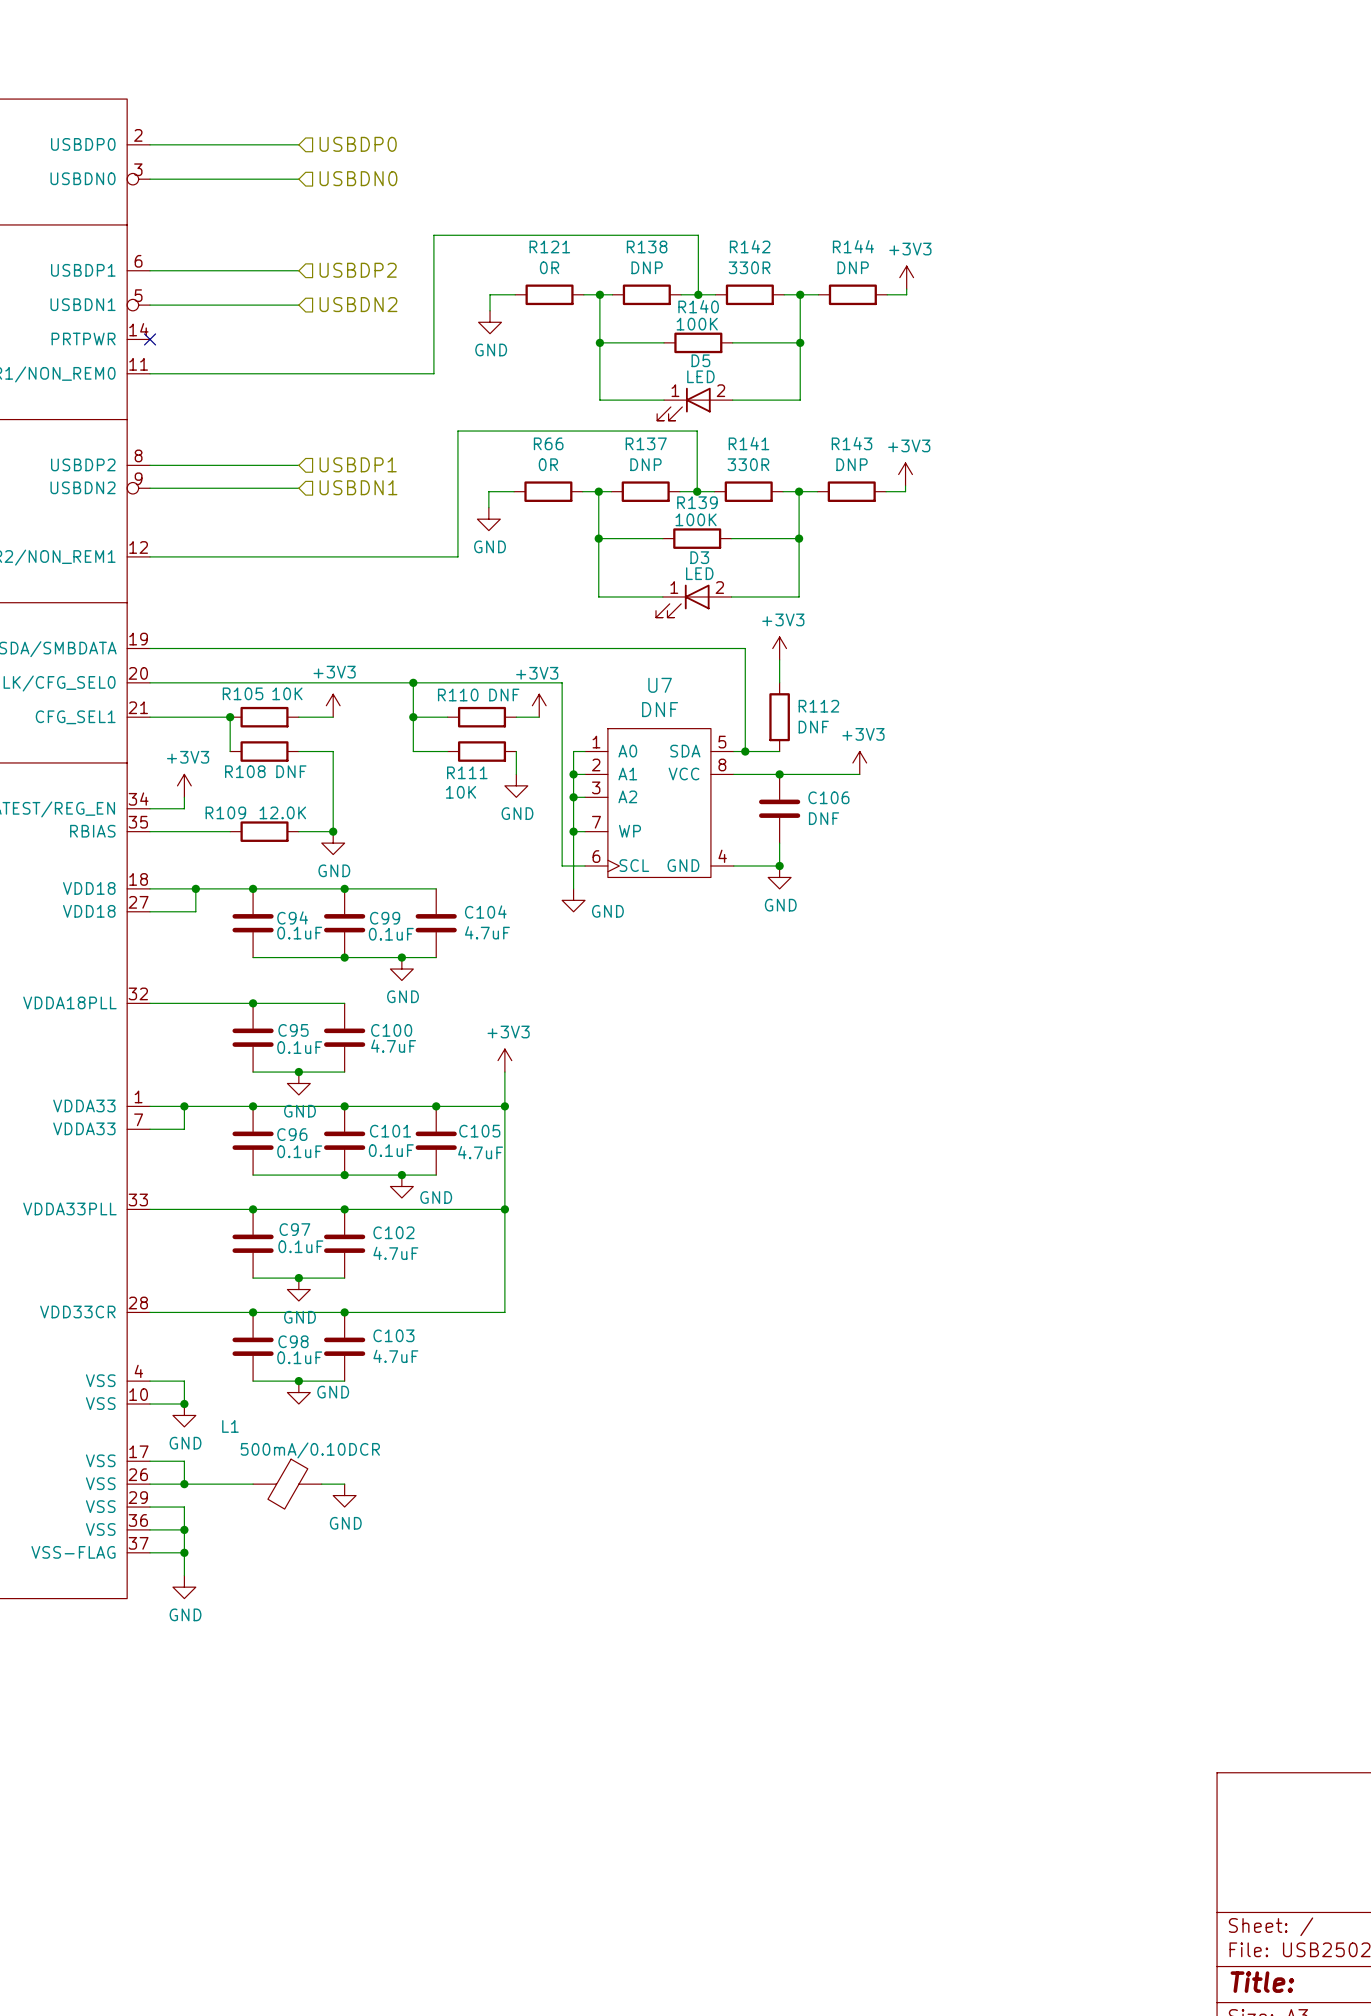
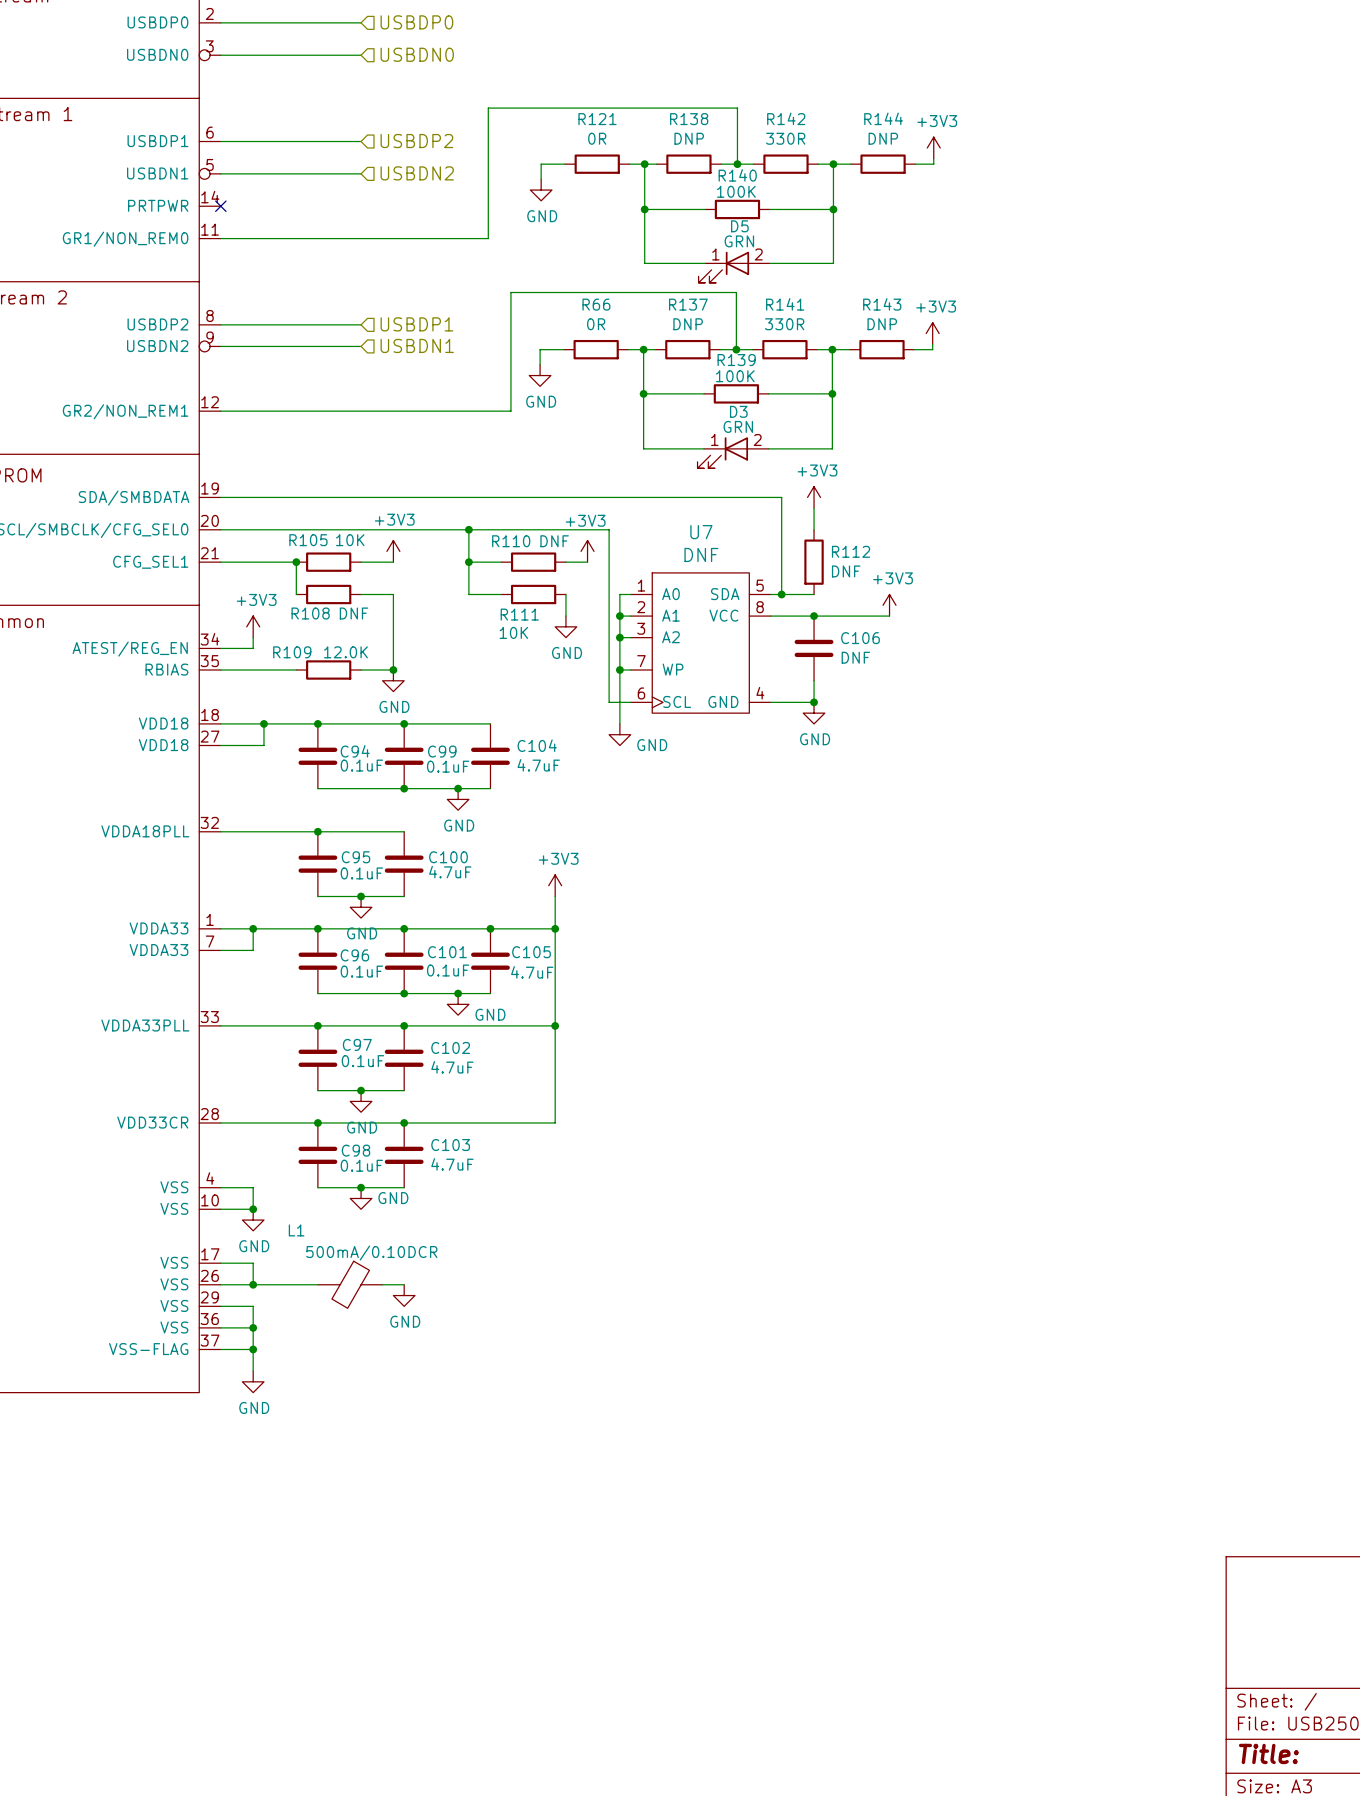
D5 value: LED (700, 376) -> GRN (739, 241)
D3 value: LED (699, 573) -> GRN (738, 426)

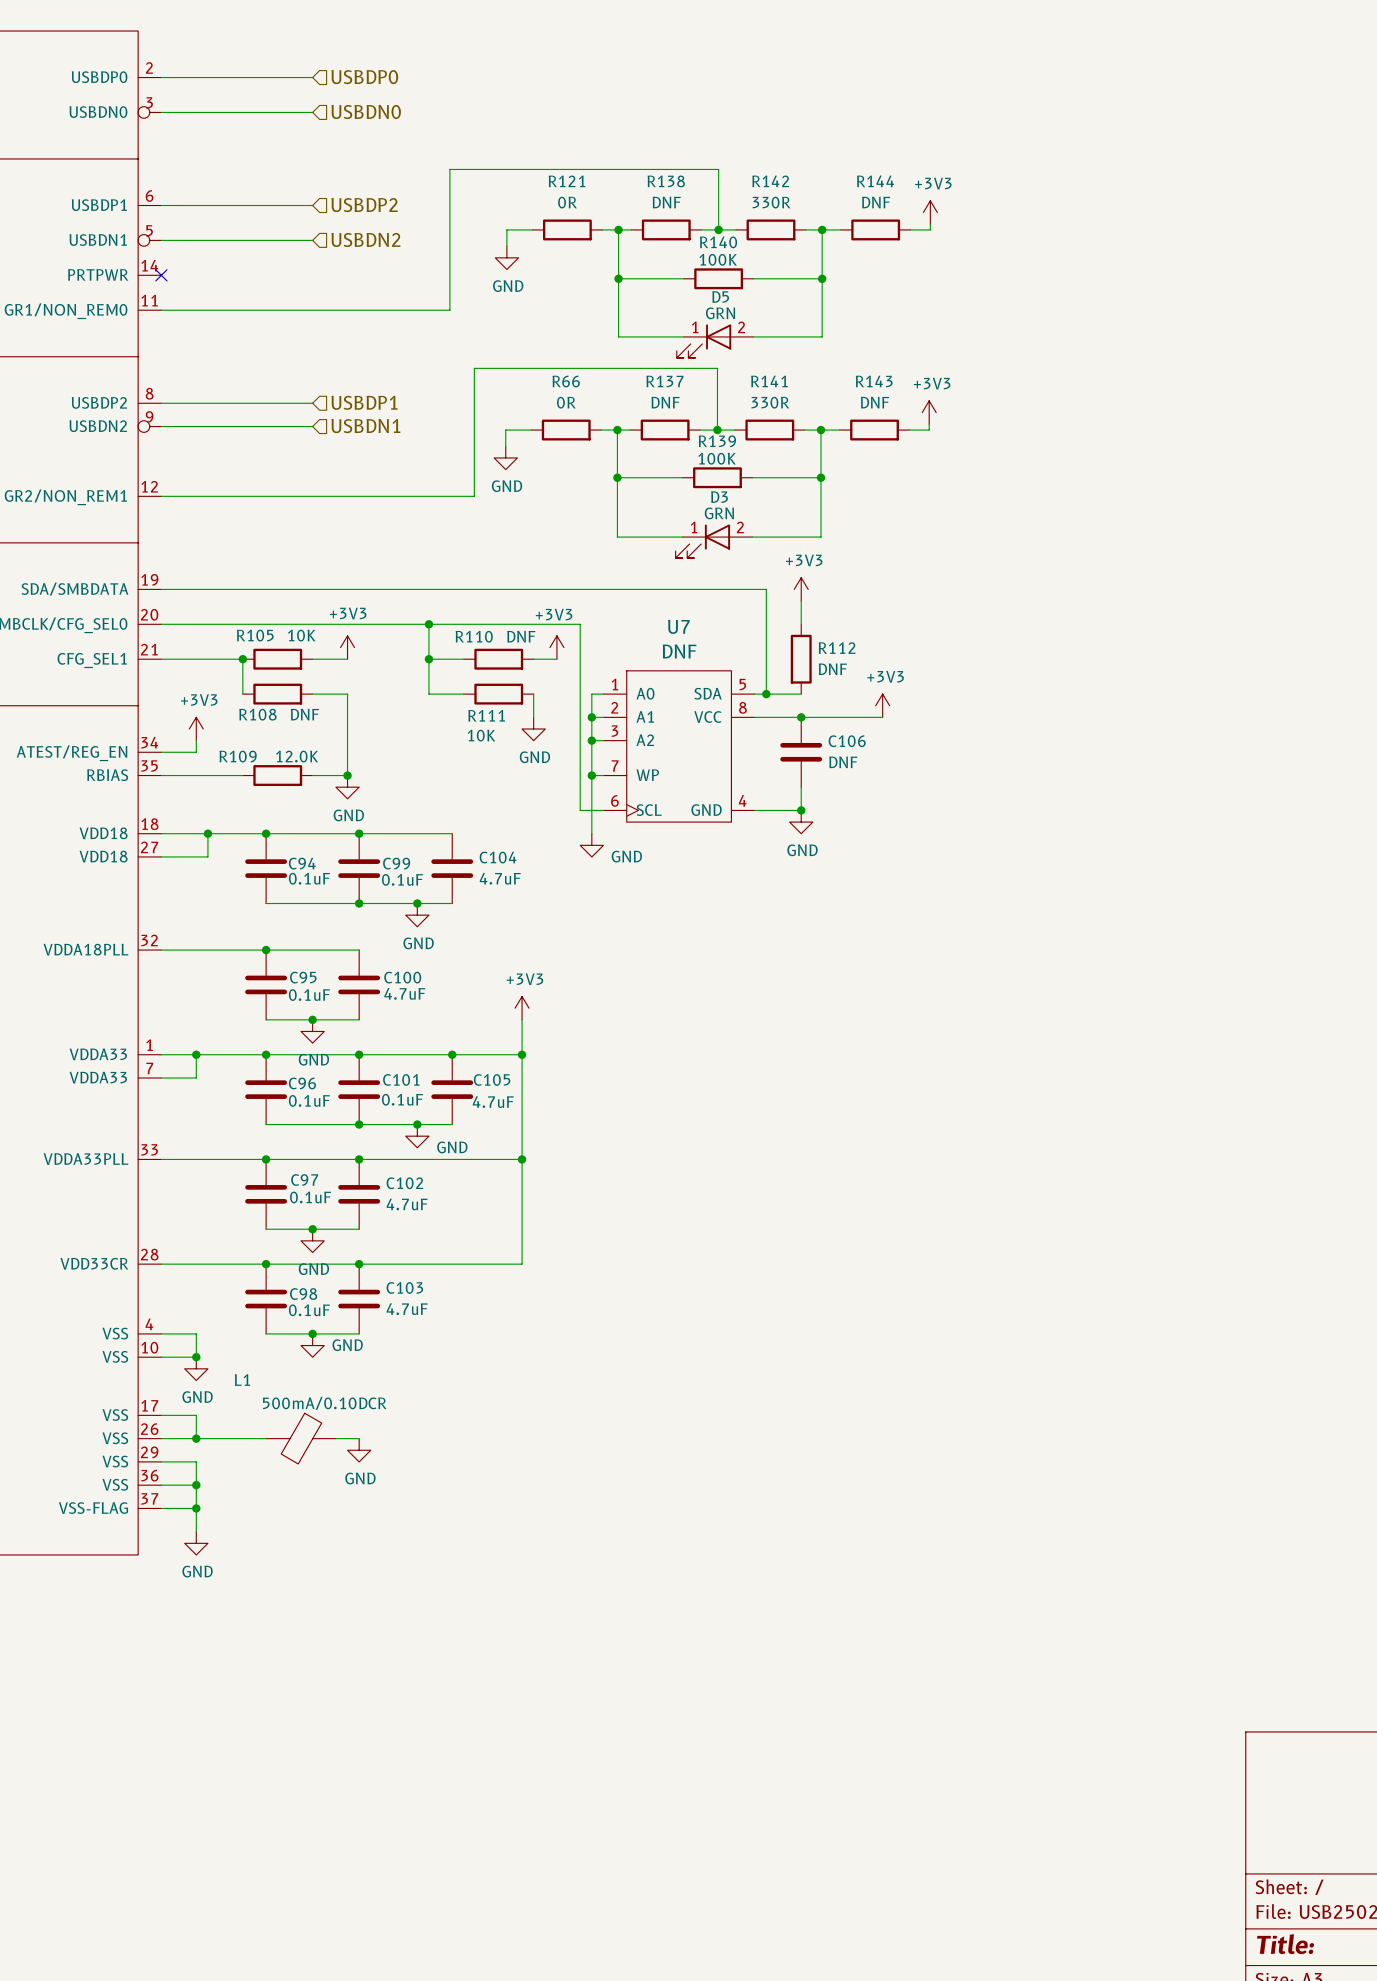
R138 value: DNP (689, 138) -> DNF (666, 202)
R144 value: DNP (883, 138) -> DNF (876, 202)
R137 value: DNP (688, 324) -> DNF (665, 402)
R143 value: DNP (882, 324) -> DNF (874, 402)

